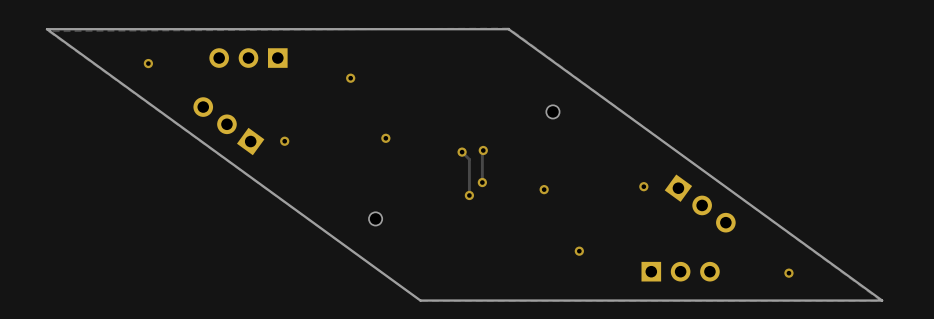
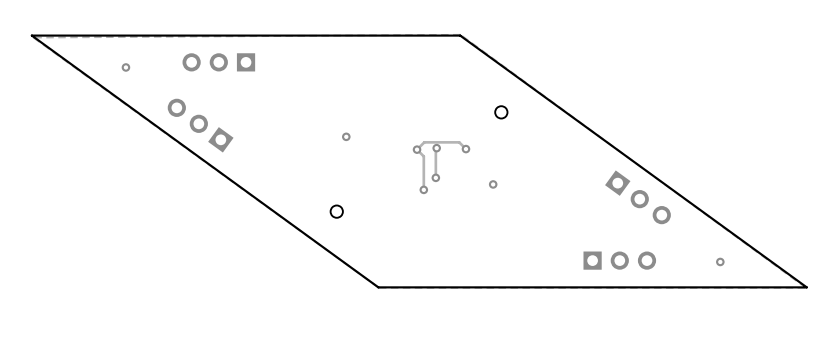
via: (350, 78) -> none
via: (284, 141) -> none
track: none -> (465, 149) (459, 142) (424, 142) (417, 149)
via: none -> (465, 149)
via: (643, 186) -> none
via: (579, 251) -> none

